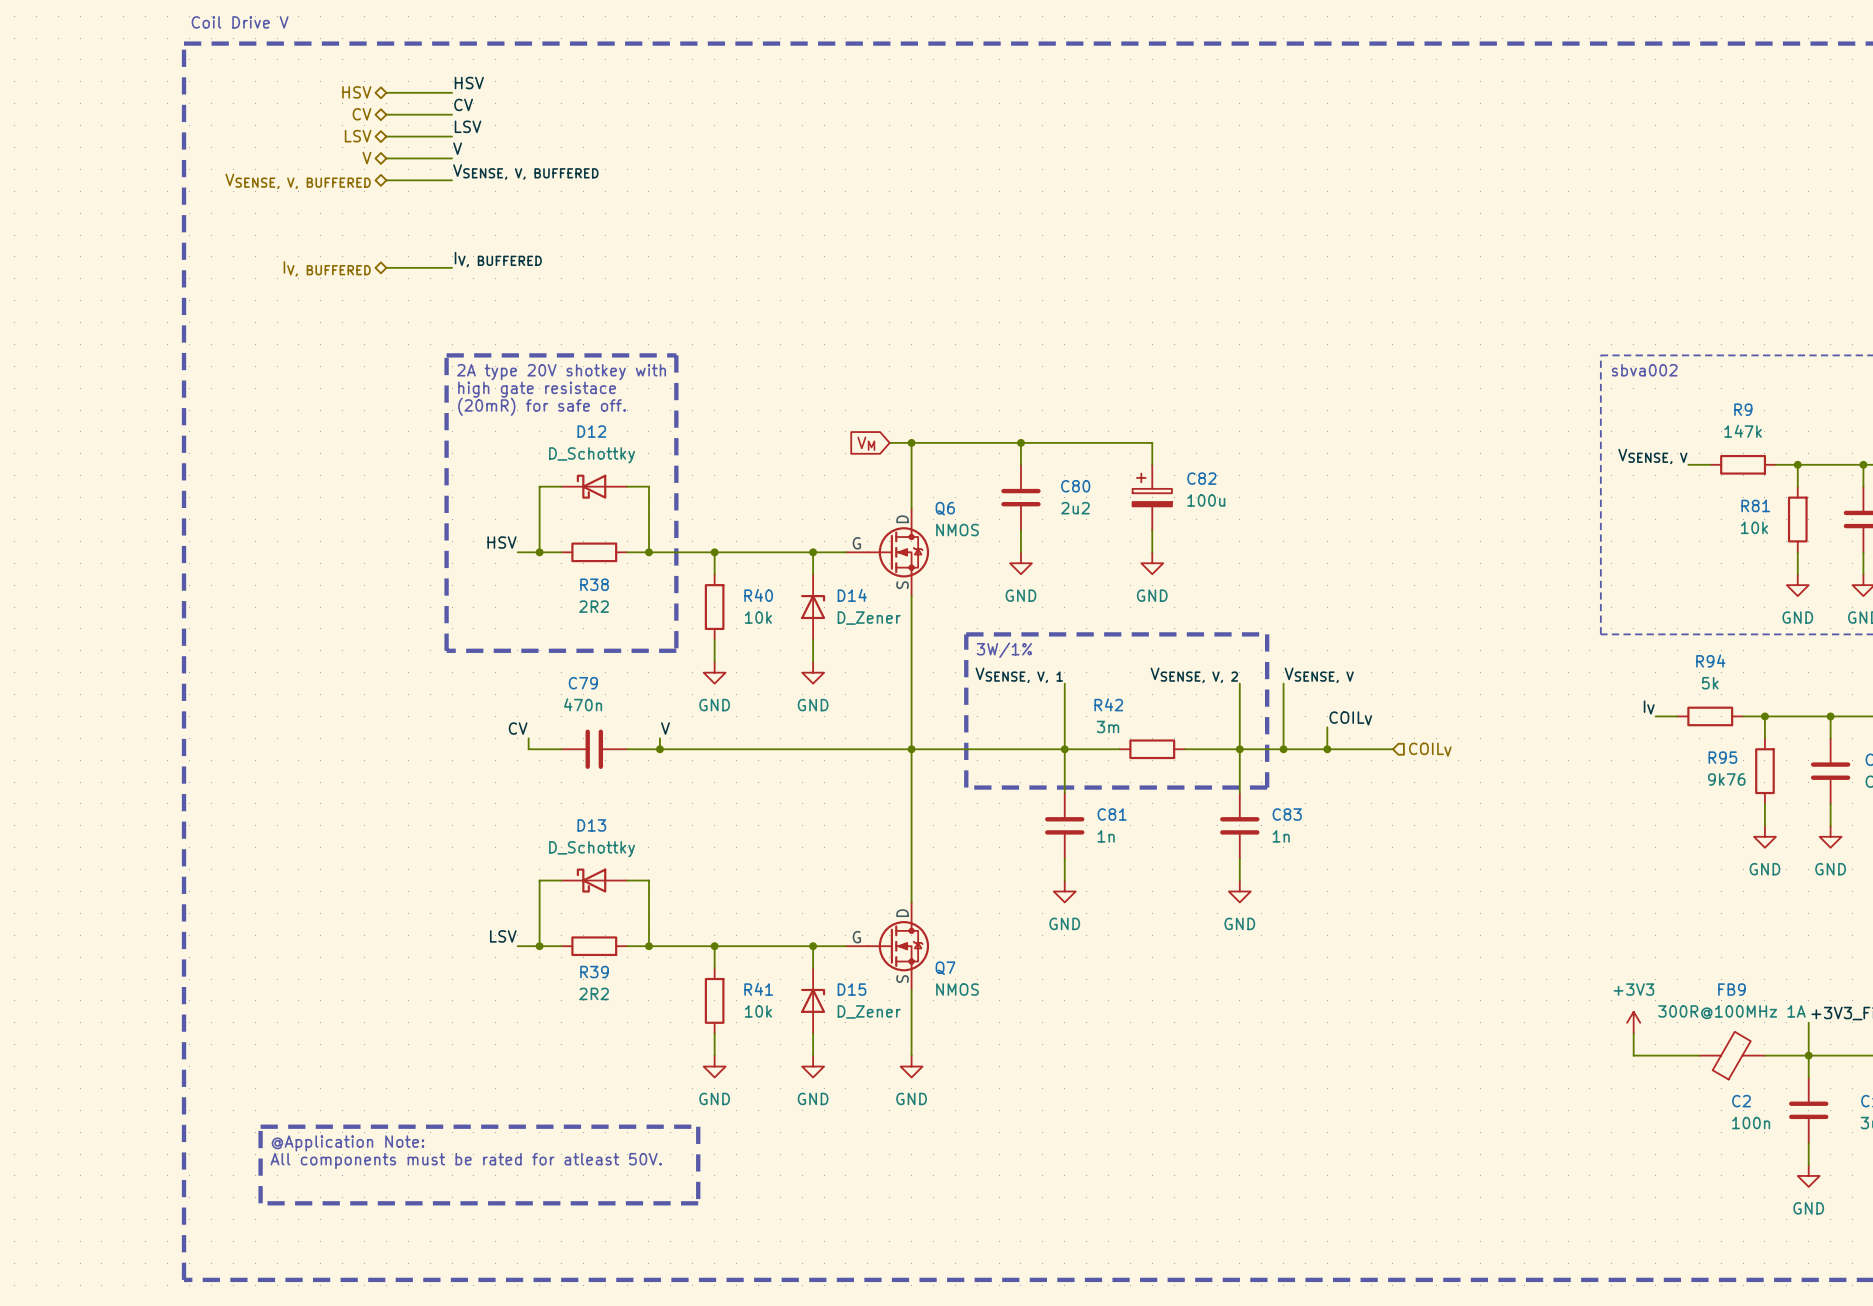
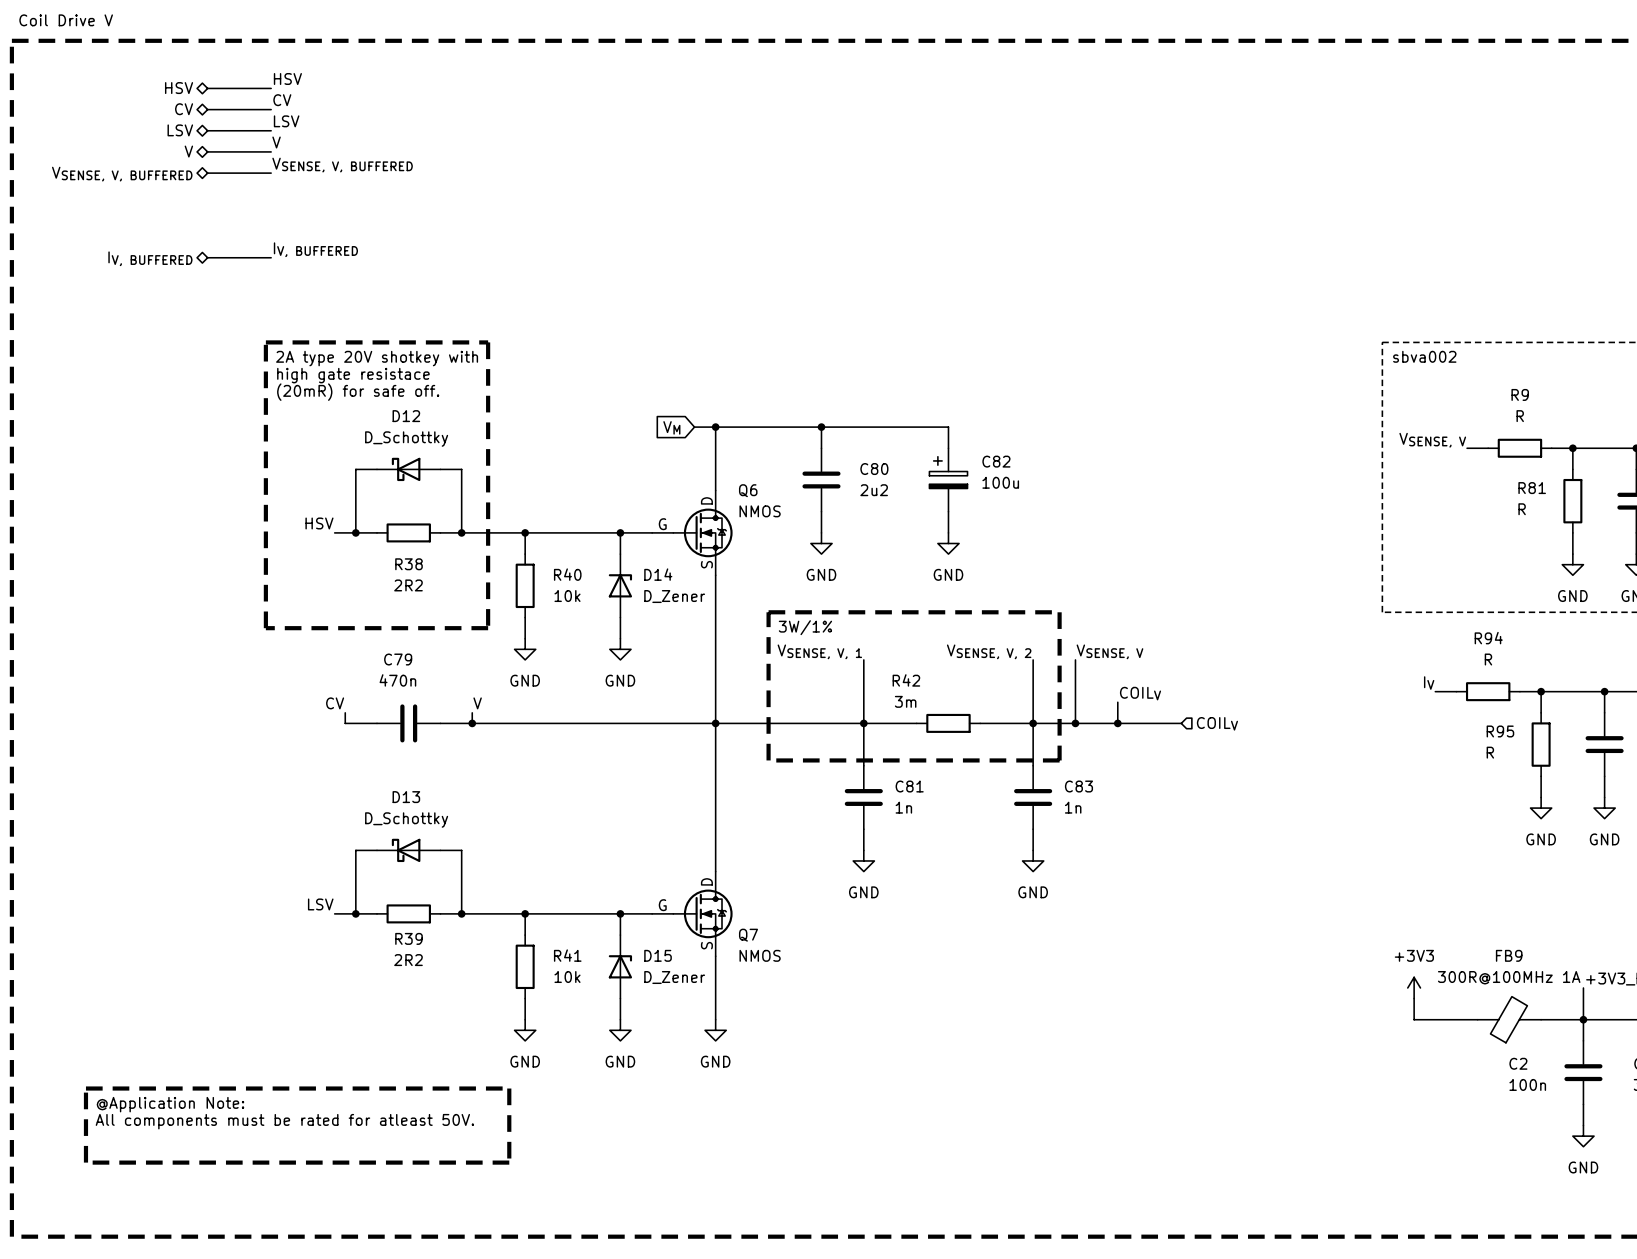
R9 value: 147k (1743, 431) -> R (1520, 416)
R81 value: 10k (1754, 527) -> R (1522, 509)
R94 value: 5k (1710, 683) -> R (1488, 659)
R95 value: 9k76 (1726, 779) -> R (1490, 752)

